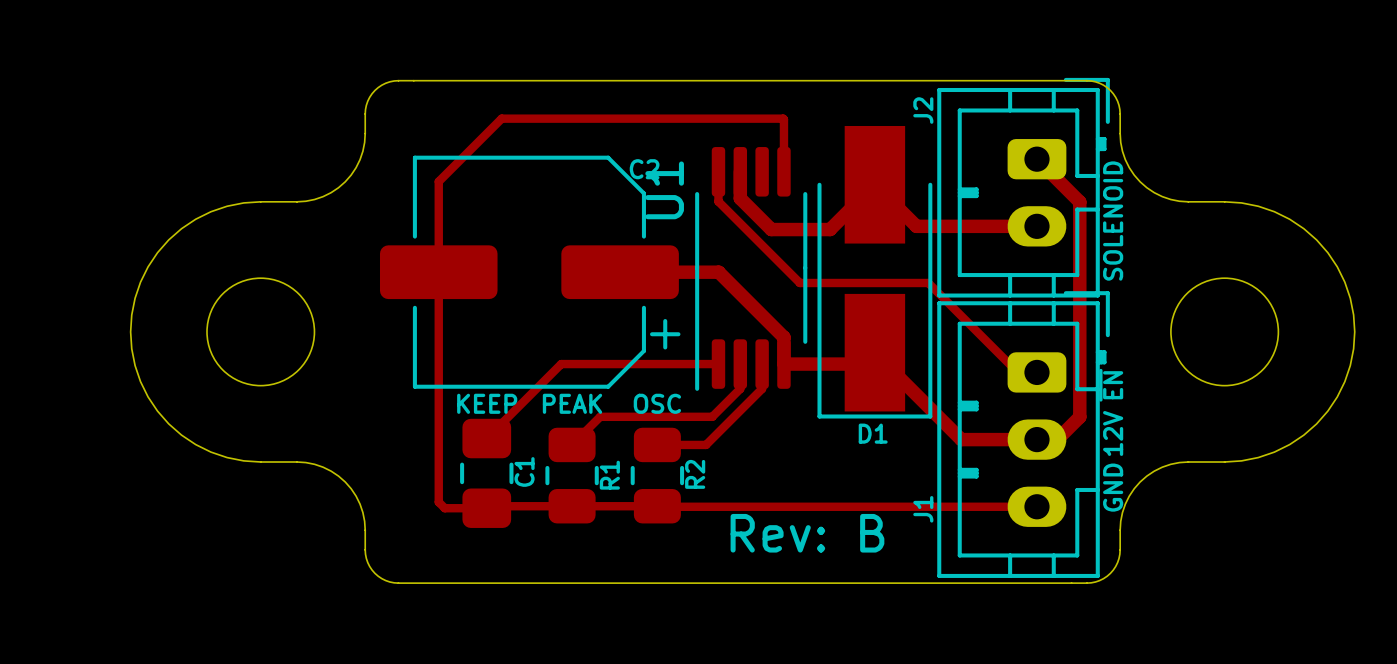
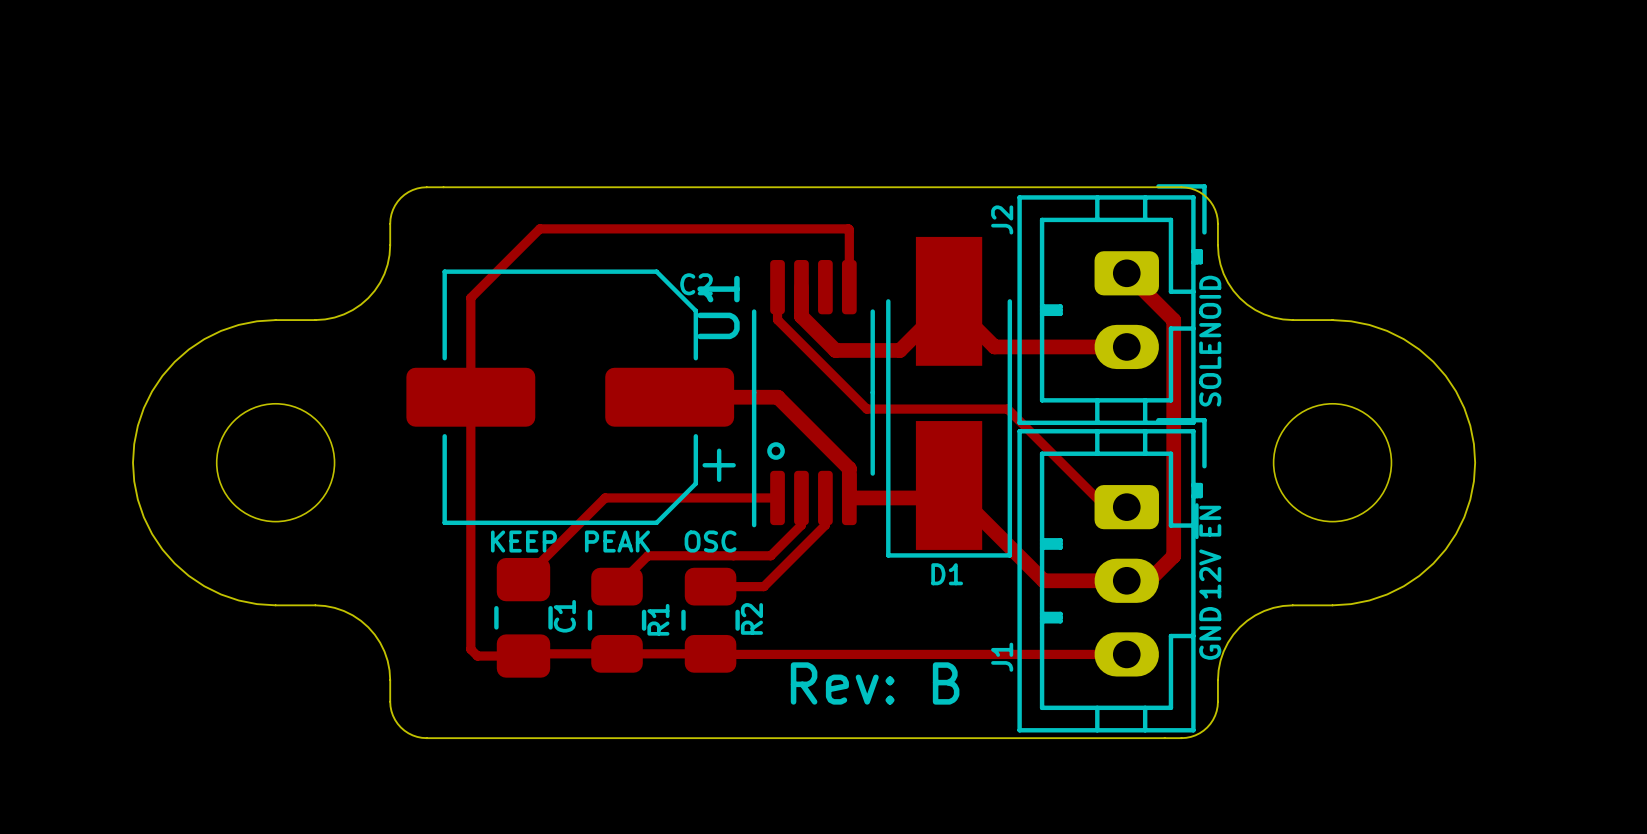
drawing: none -> [767, 442, 785, 460]

